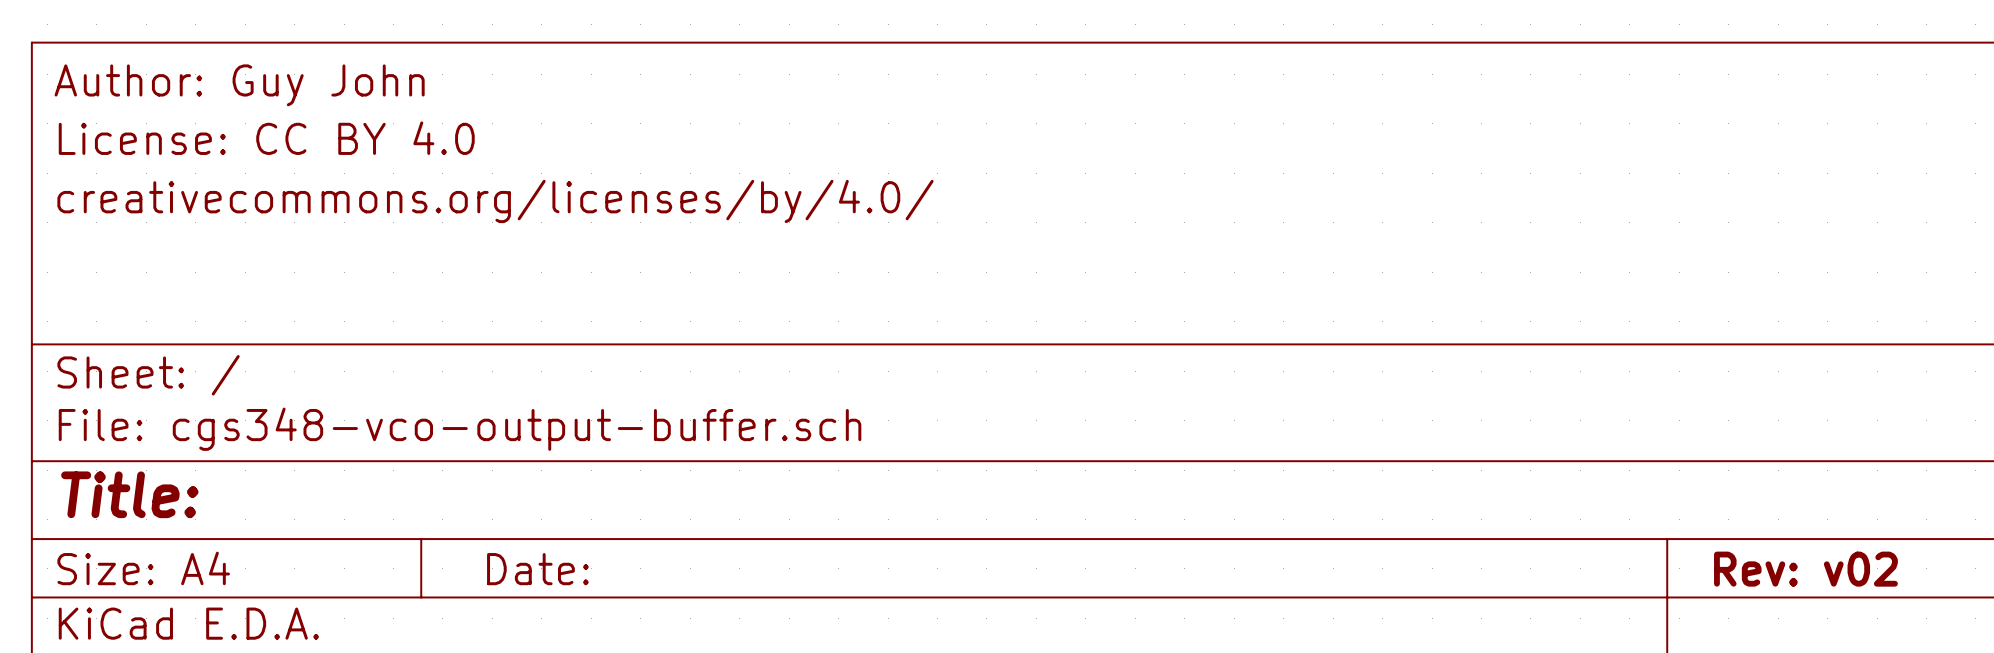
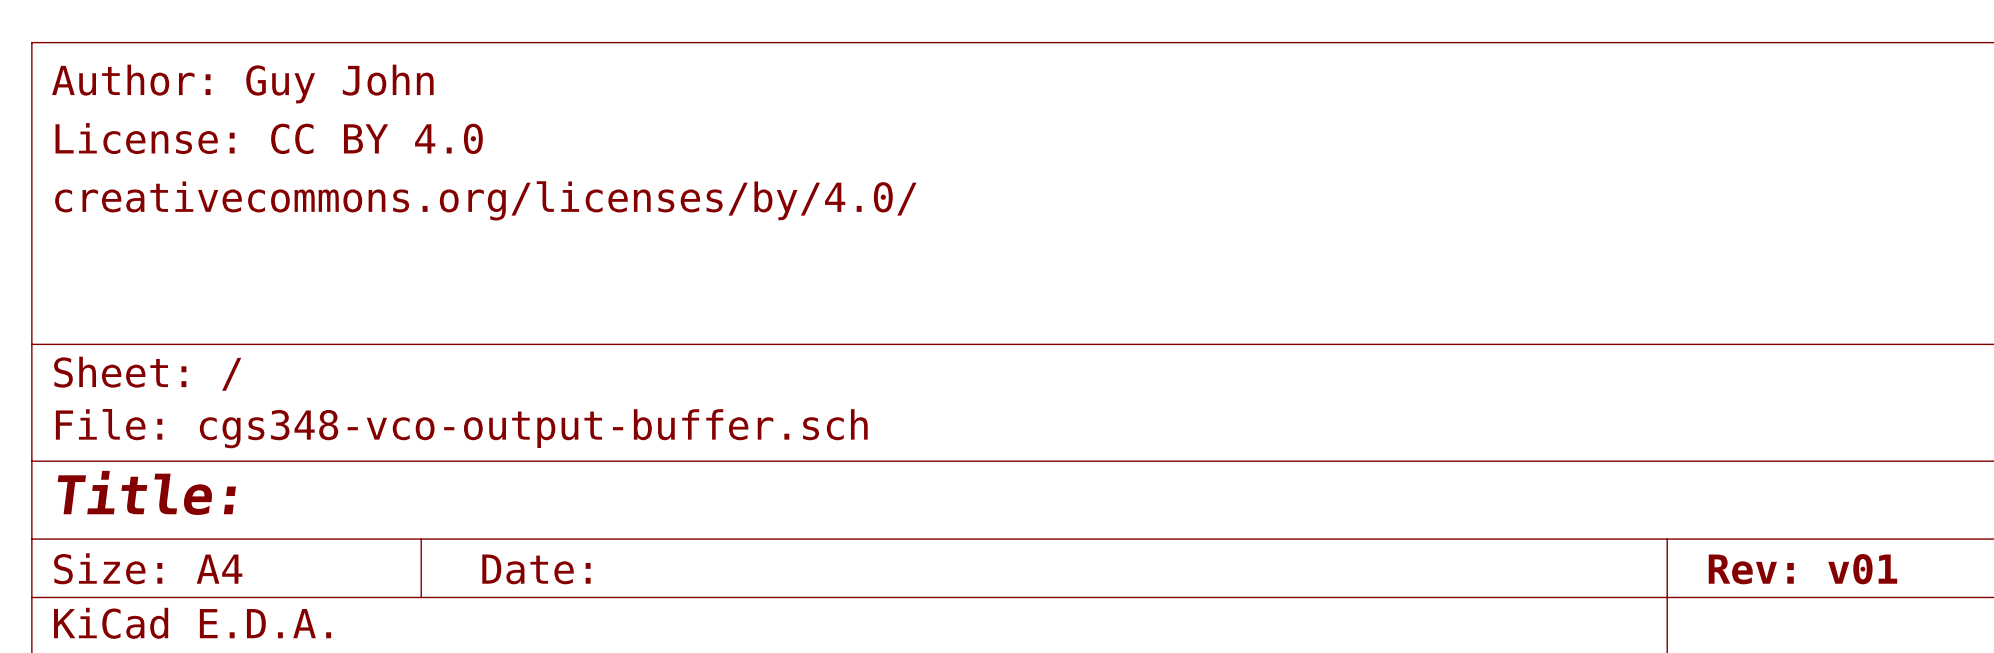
title block: Rev: v02 (1805, 569) -> Rev: v01 (1802, 569)

